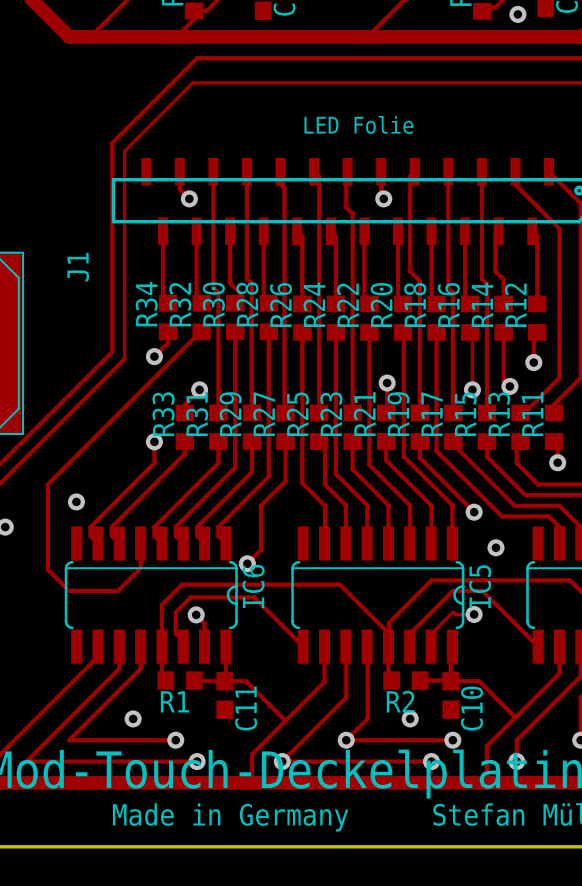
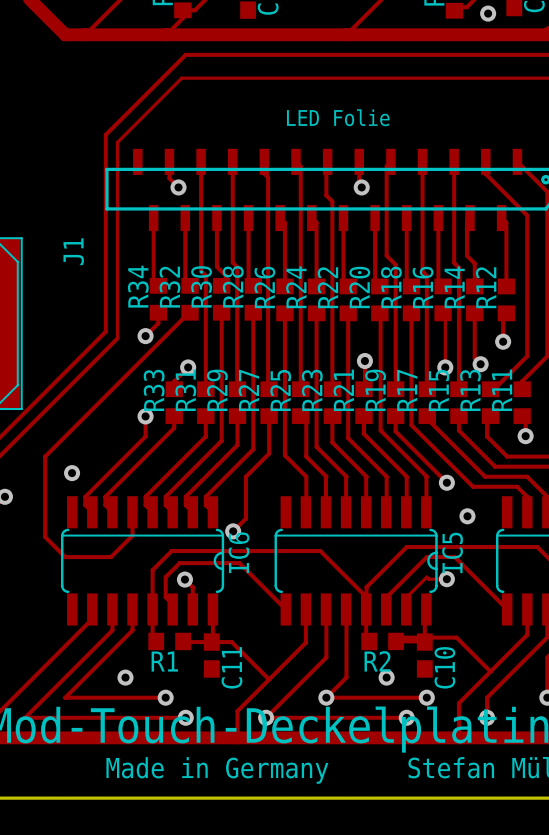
track: none -> (396, 637) (456, 637) (490, 671)
track: (450, 681) (479, 681) (515, 717) -> none

